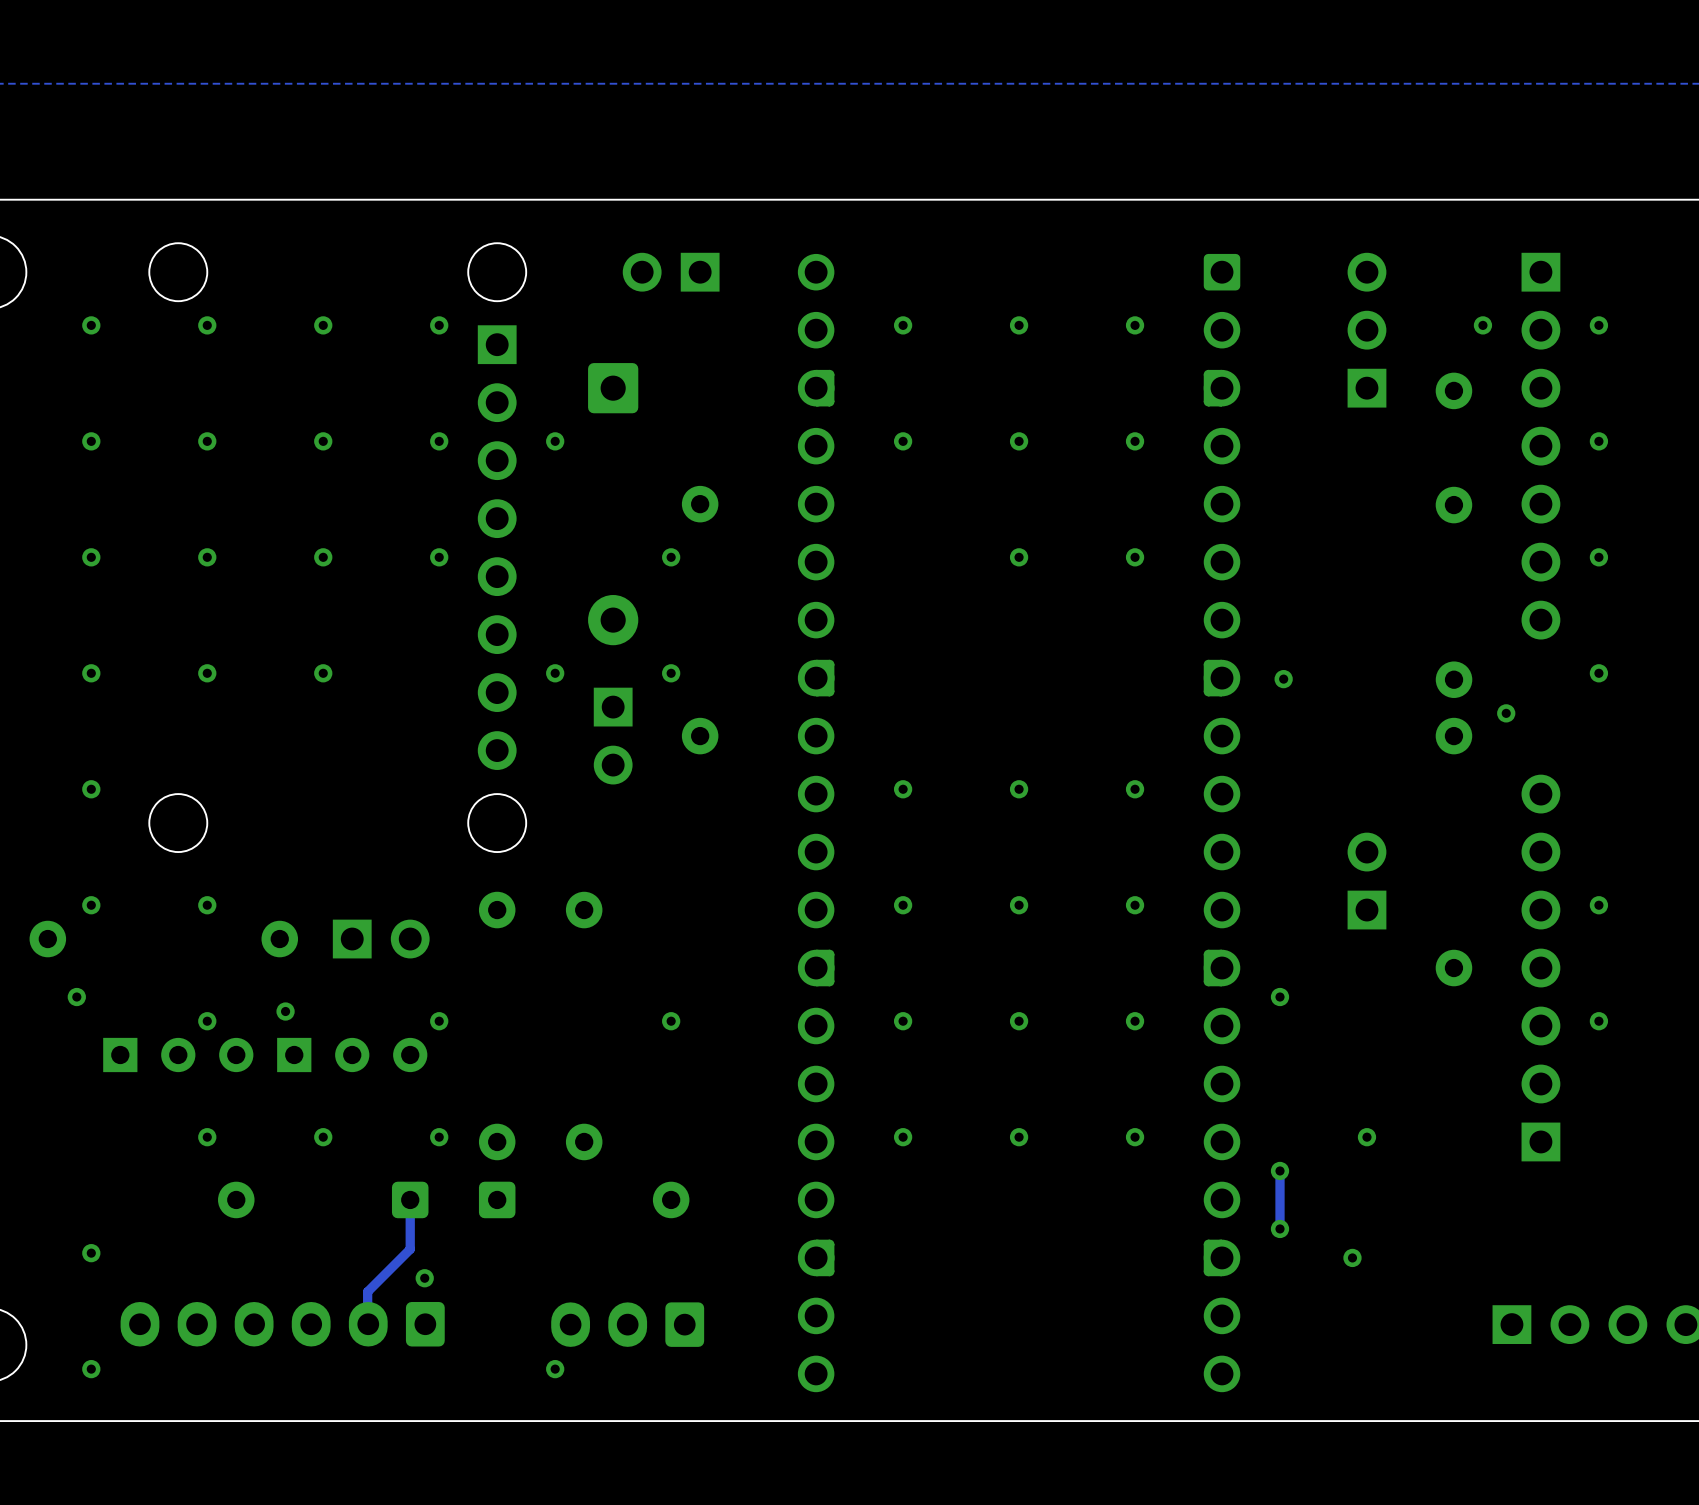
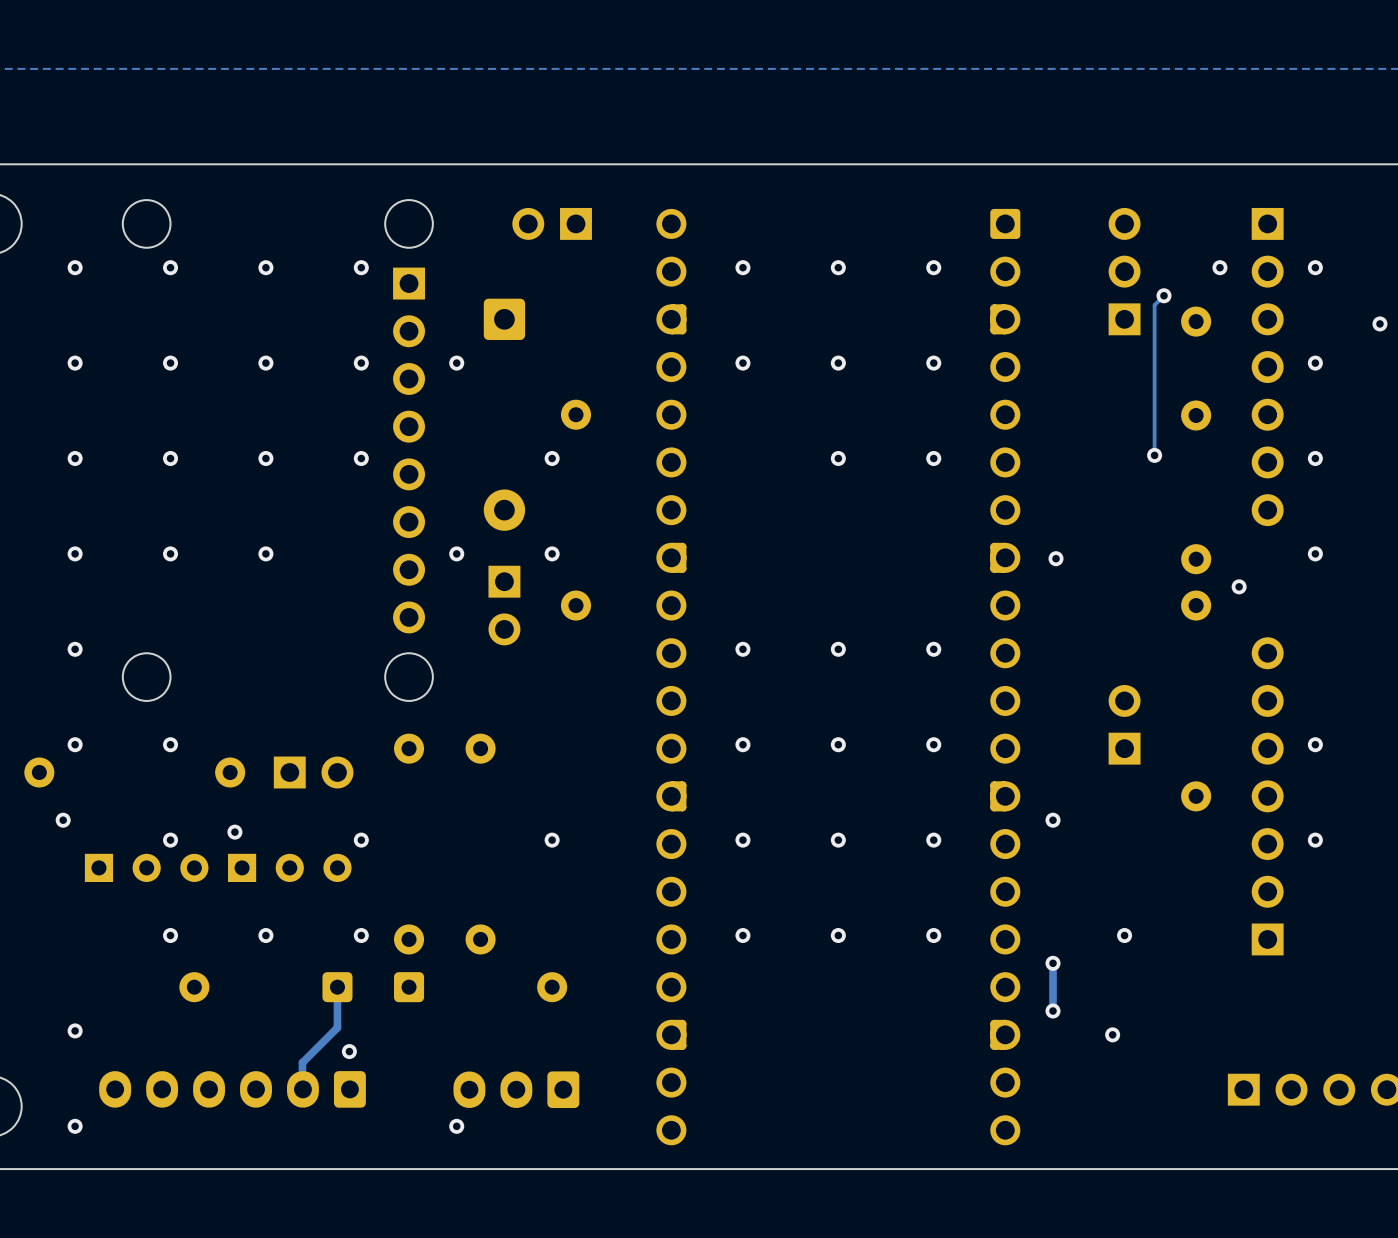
track: none -> (1164, 295) (1154, 305) (1154, 455)
via: none -> (1164, 295)
via: none -> (1379, 323)
via: none -> (1154, 455)

